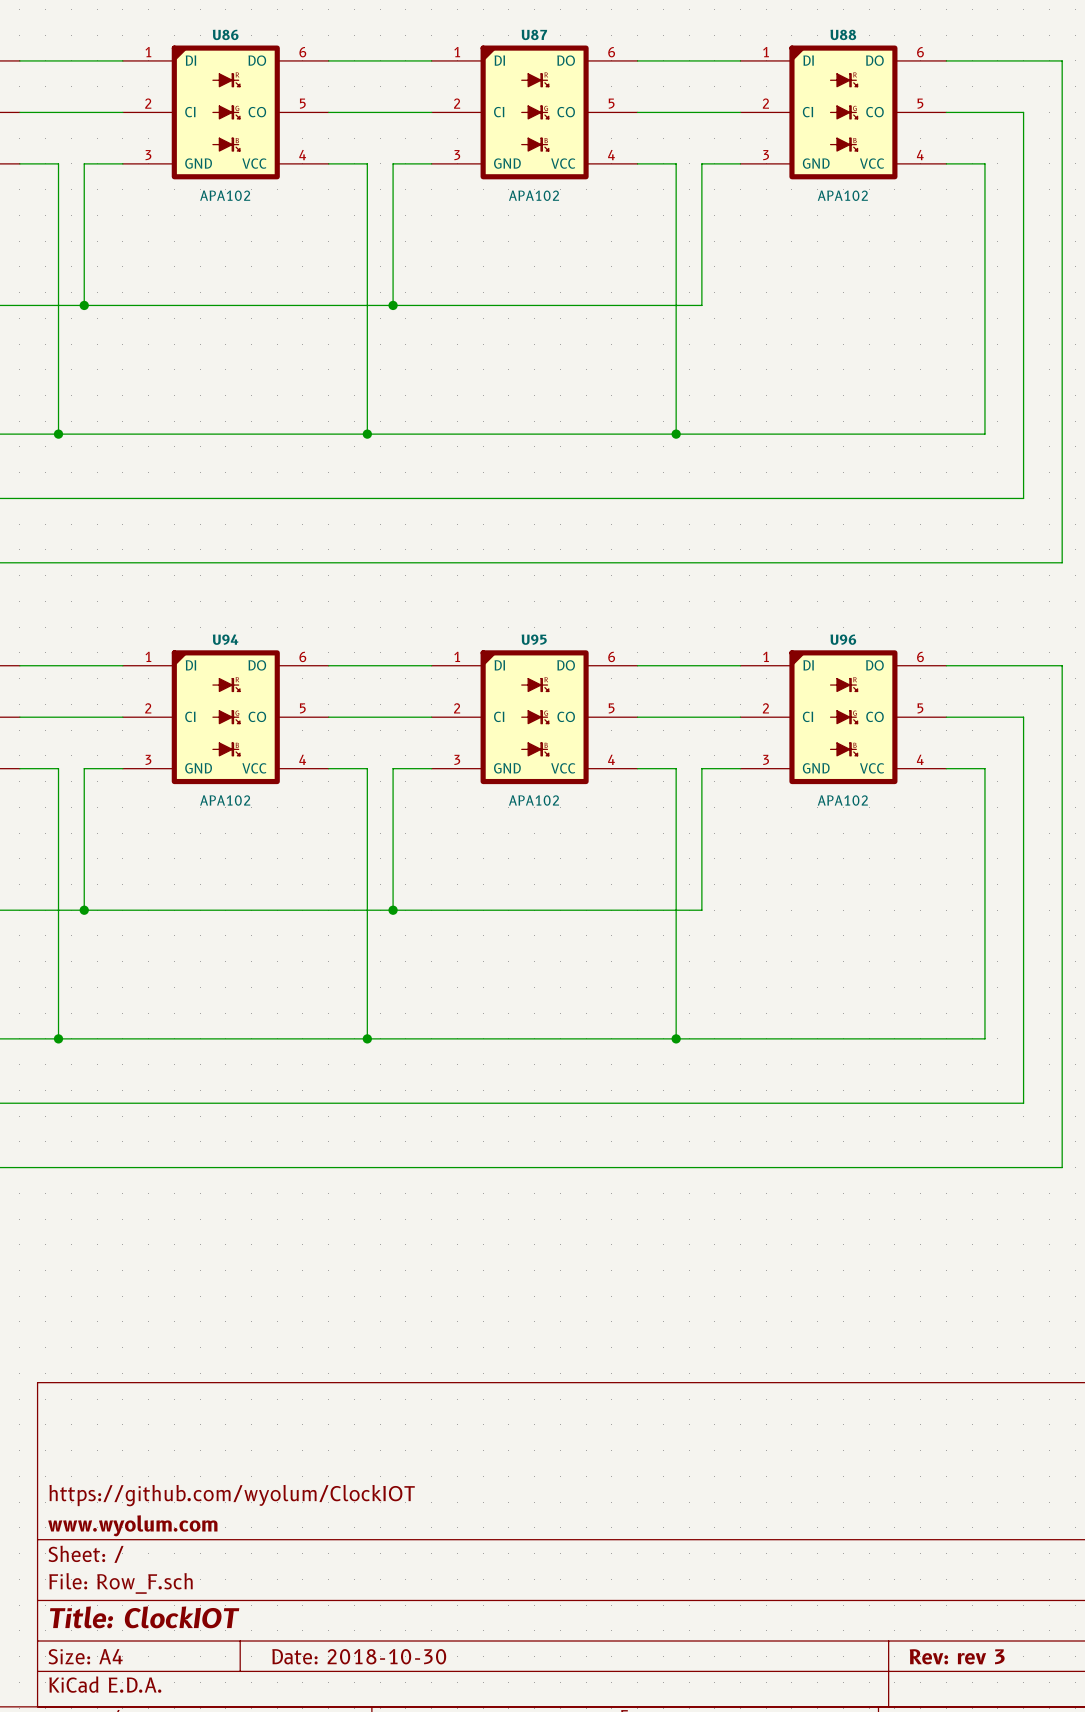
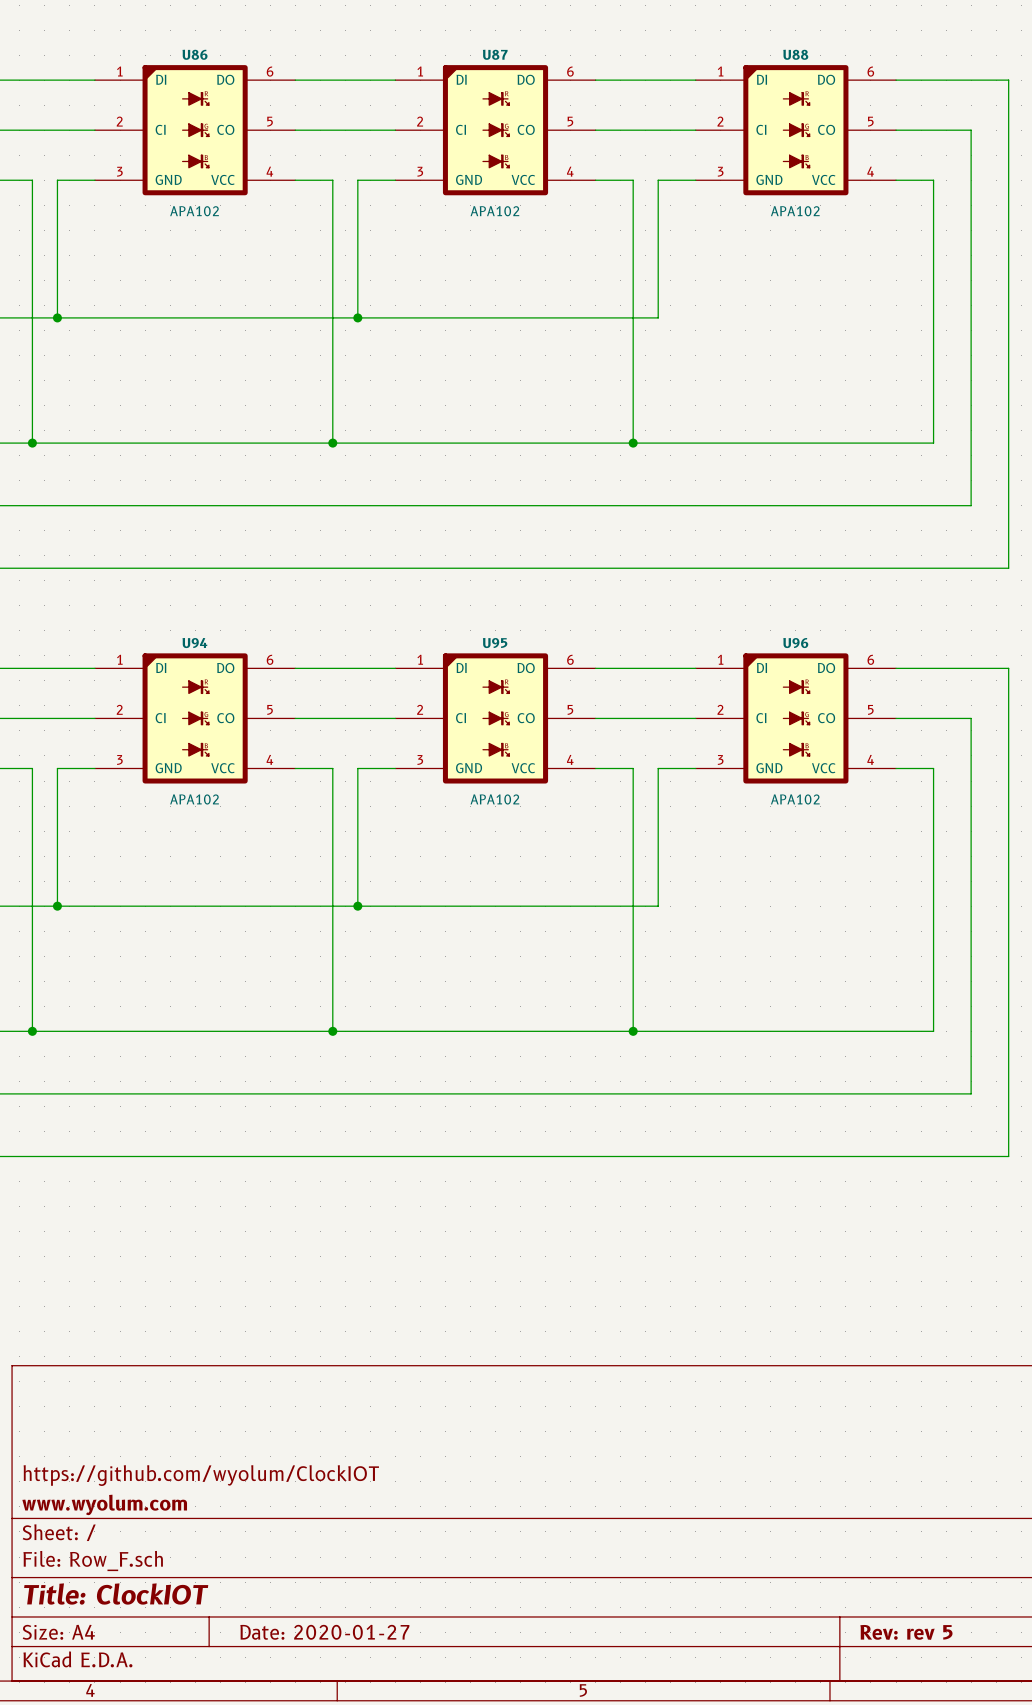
title block: Date: 2018-10-30 (359, 1656) -> Date: 2020-01-27 (324, 1632)
title block: Rev: rev 3 (957, 1656) -> Rev: rev 5 (906, 1632)

